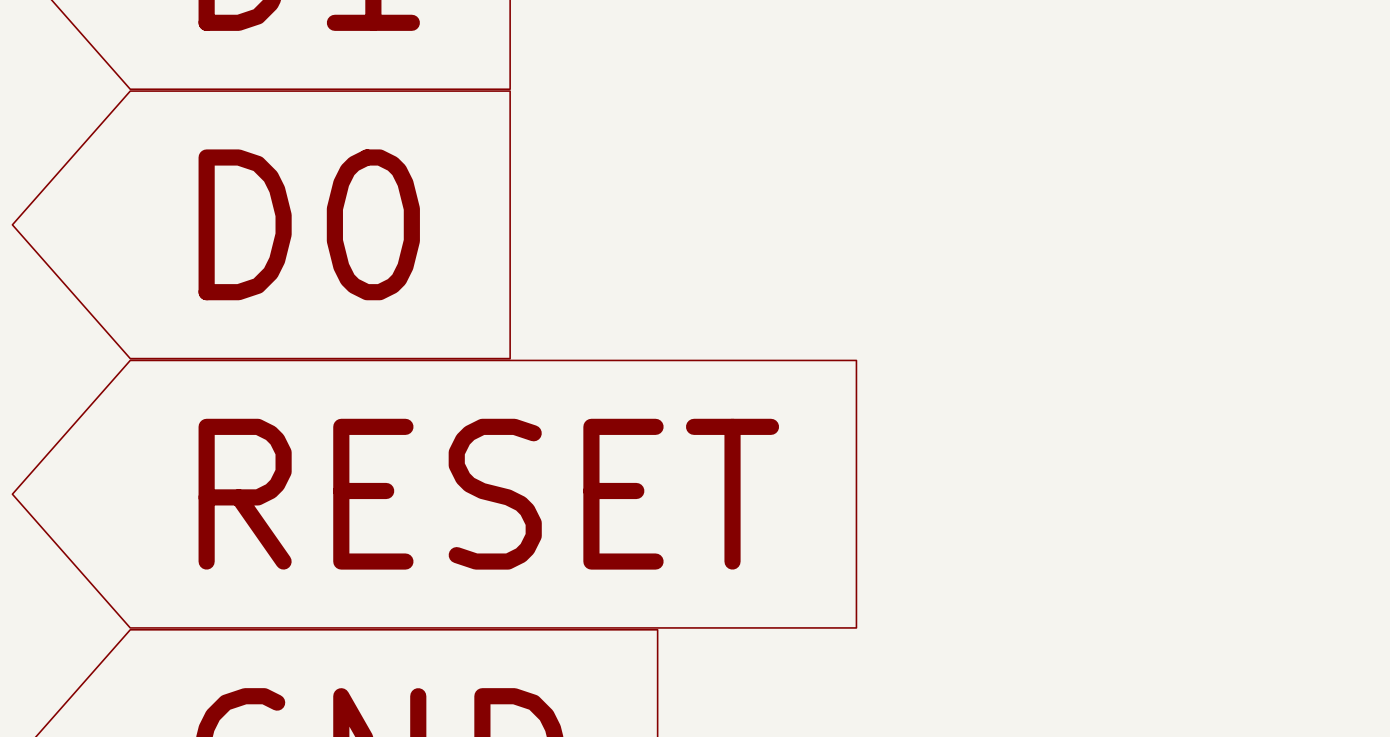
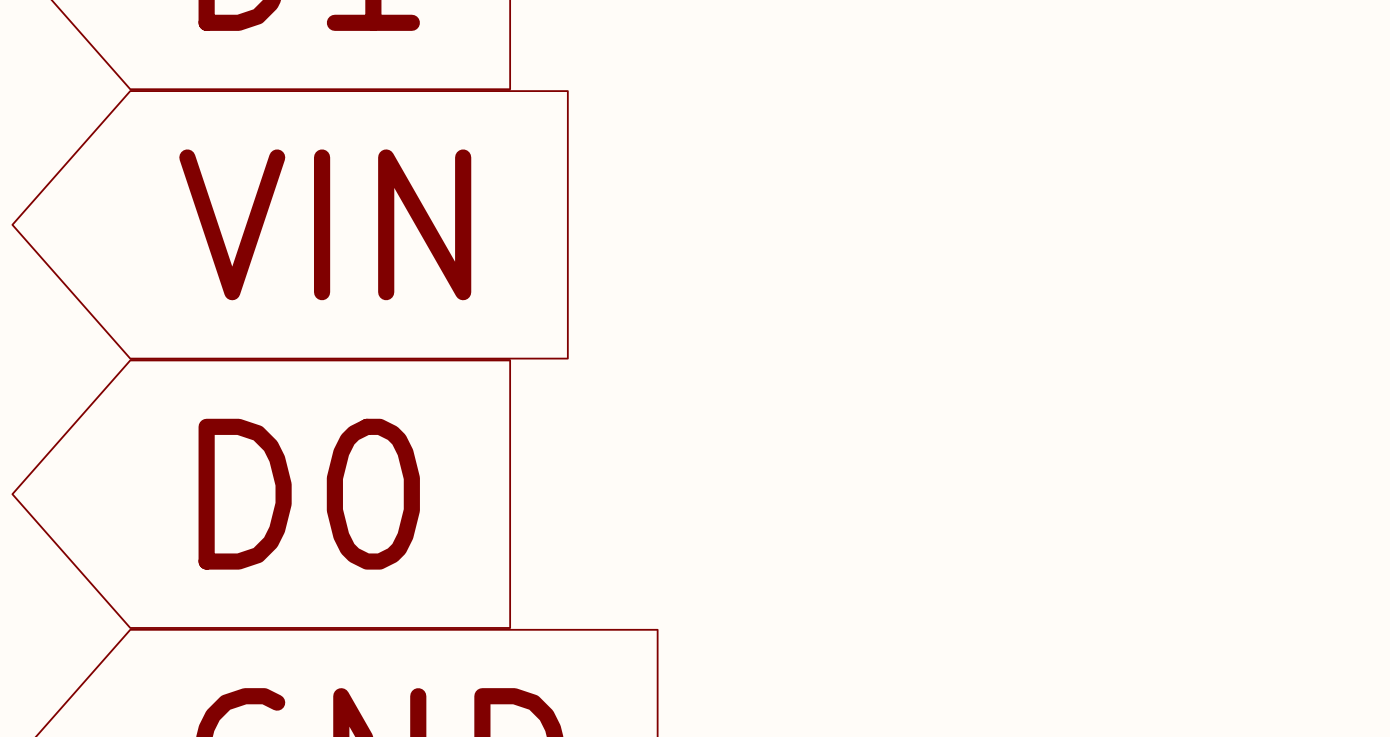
global label: D0 (309, 224) -> VIN (325, 224)
global label: RESET (488, 494) -> D0 (309, 494)

